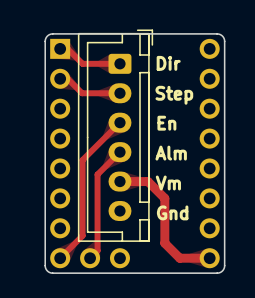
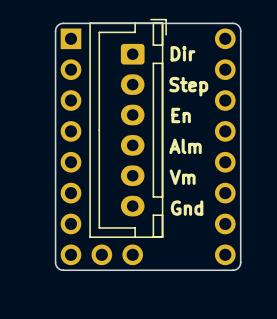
track: (60, 48) (67, 48) (82, 63) (119, 63) -> none
track: (60, 78) (67, 78) (82, 93) (119, 93) -> none
track: (119, 122) (82, 160) (82, 235) (60, 258) -> none
track: (119, 152) (97, 174) (97, 250) (90, 258) -> none
track: (119, 181) (148, 181) (164, 198) (164, 243) (179, 258) (209, 258) -> none

